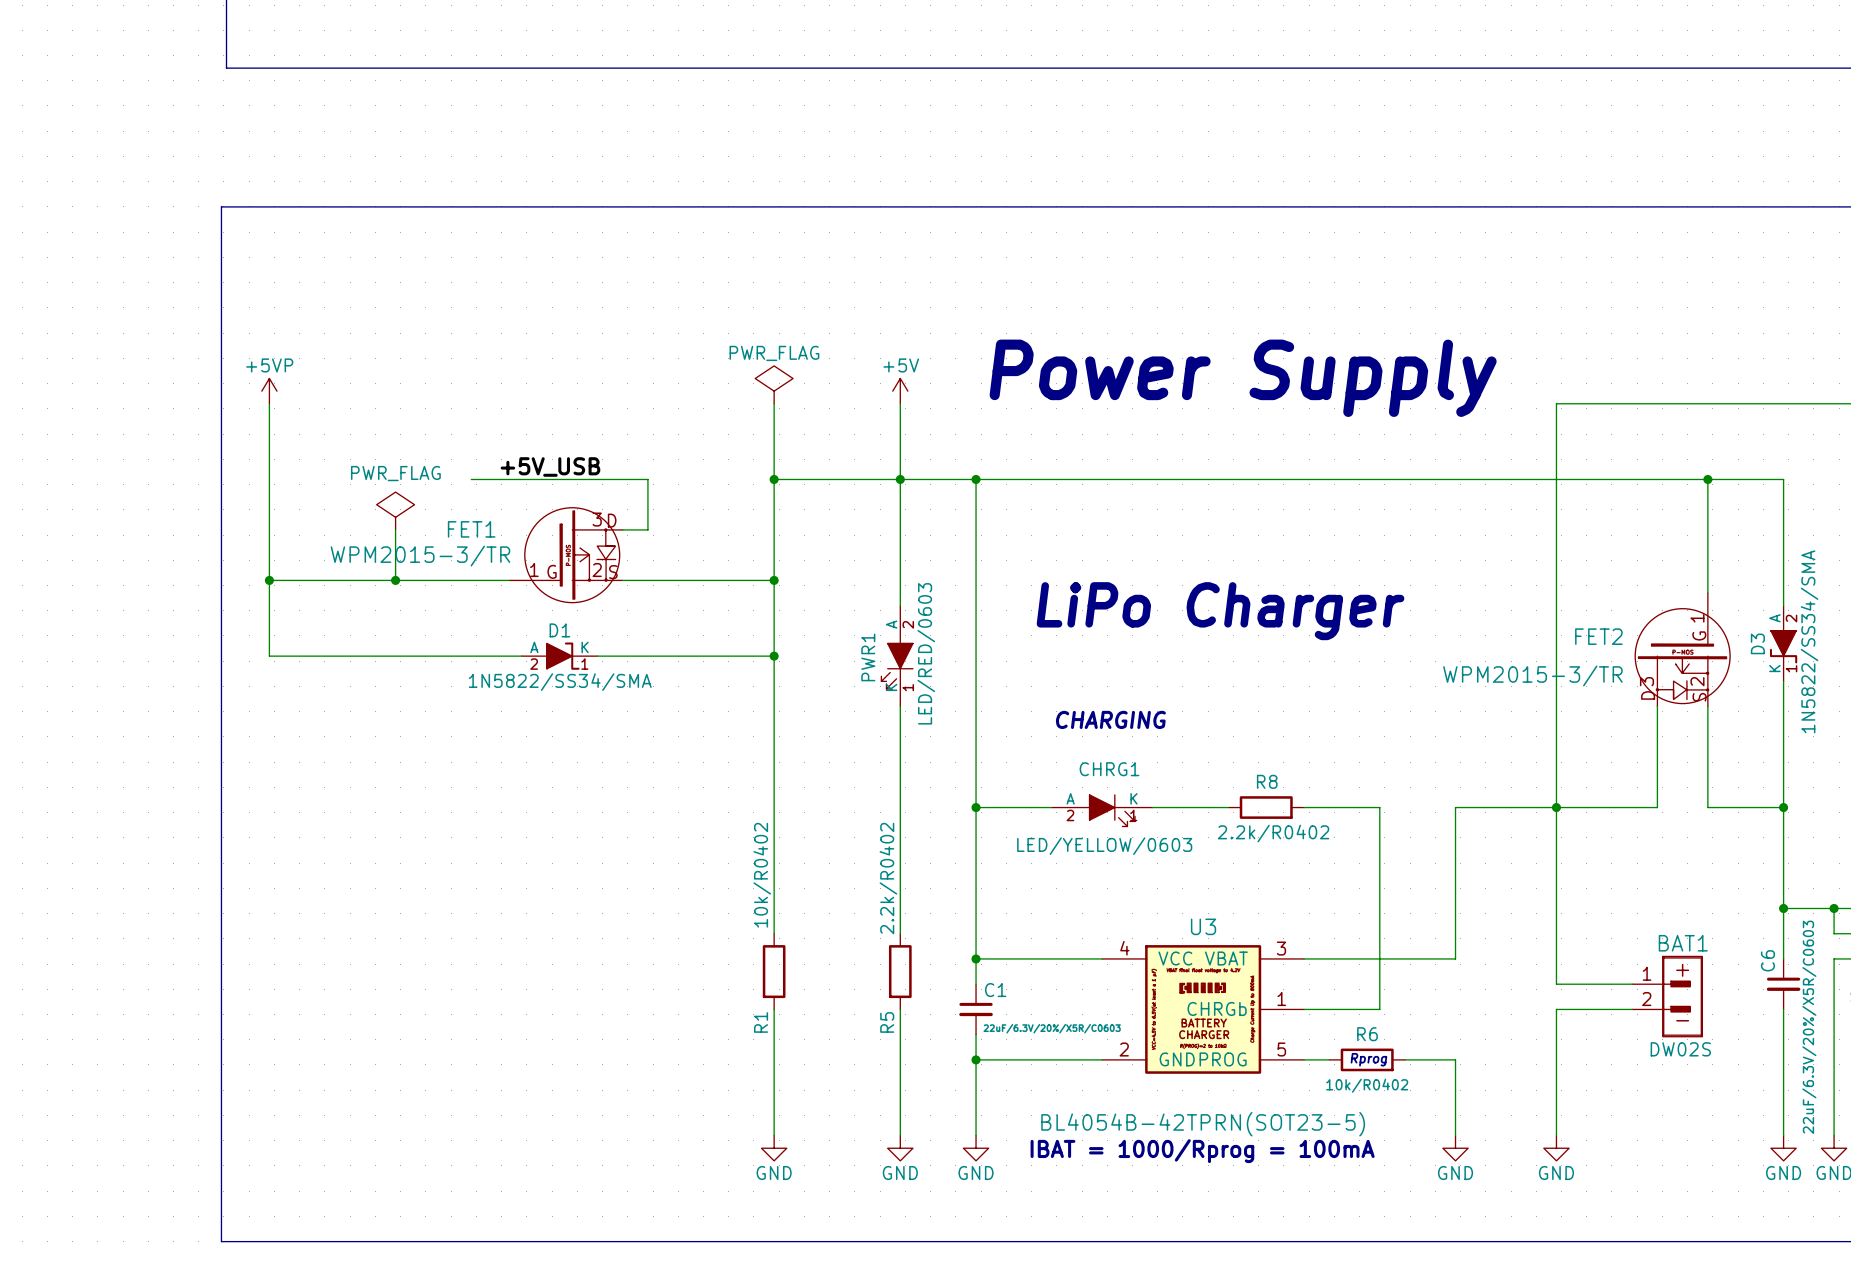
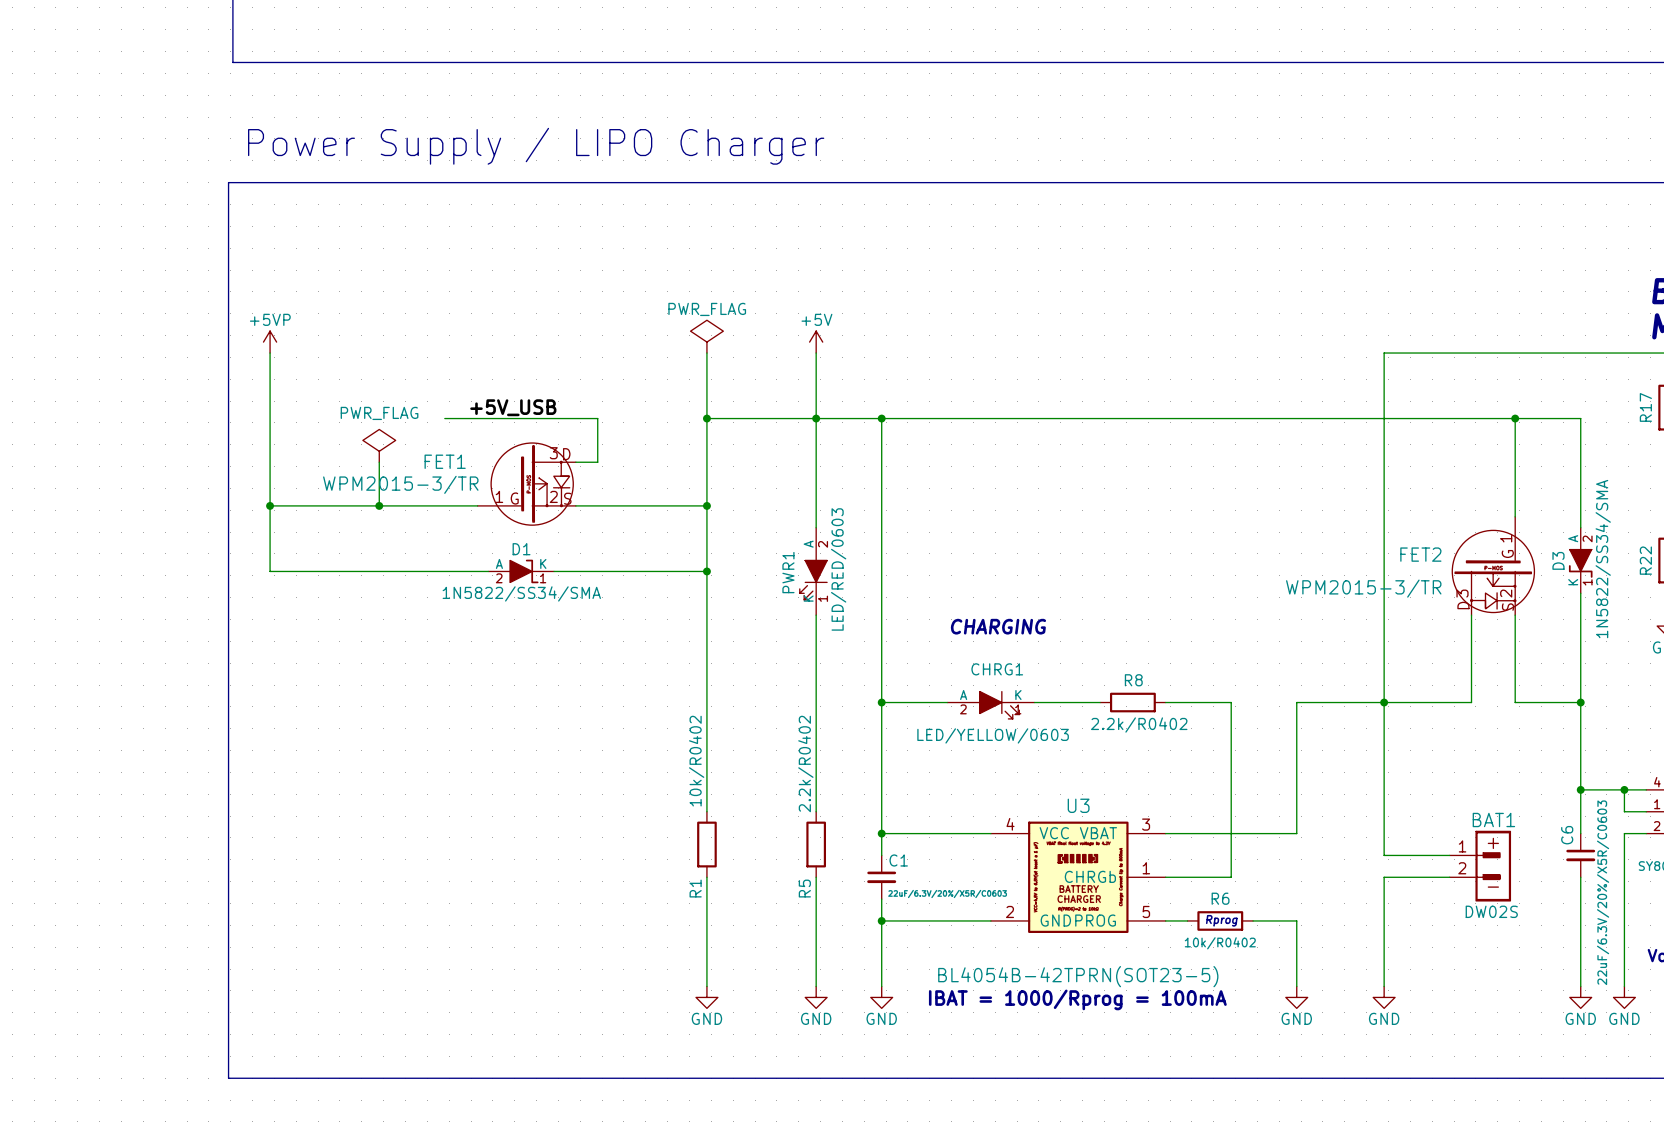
text: none -> Power Supply / LIPO Charger (536, 146)
text: Power Supply (1243, 378) -> none
text: LiPo Charger (1220, 611) -> none

